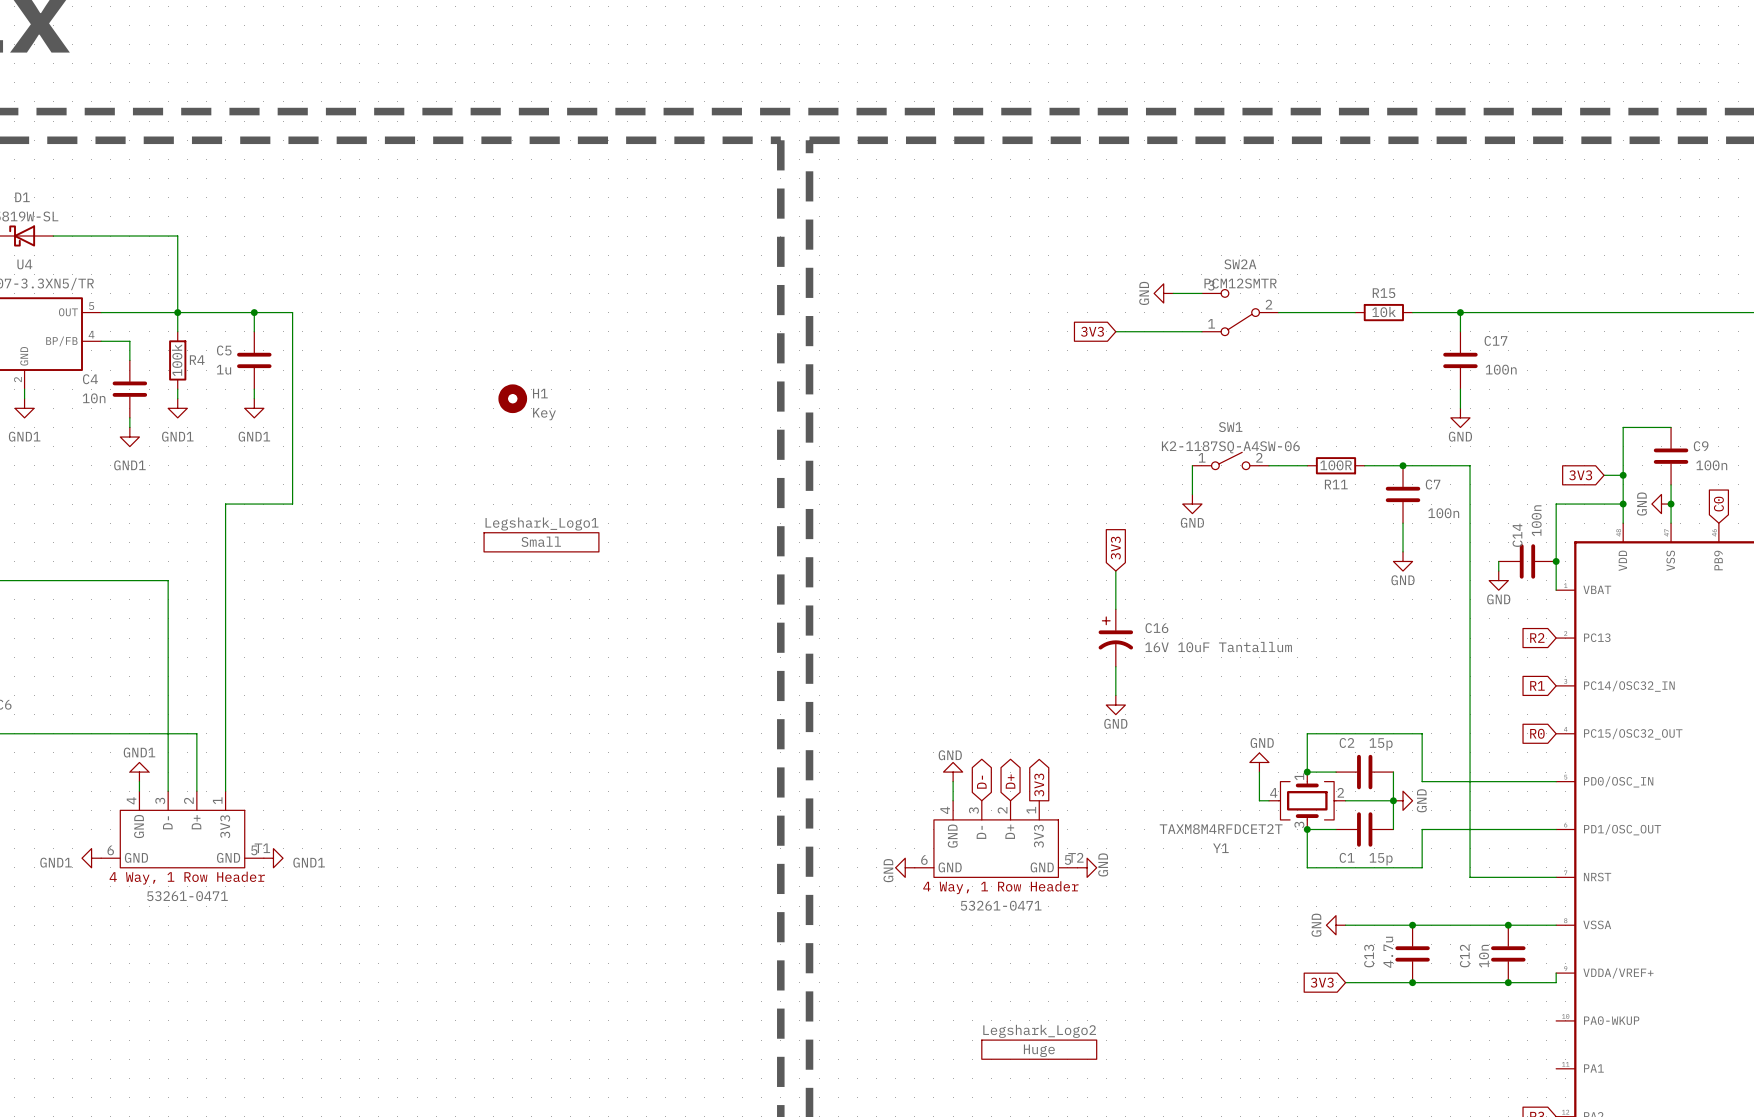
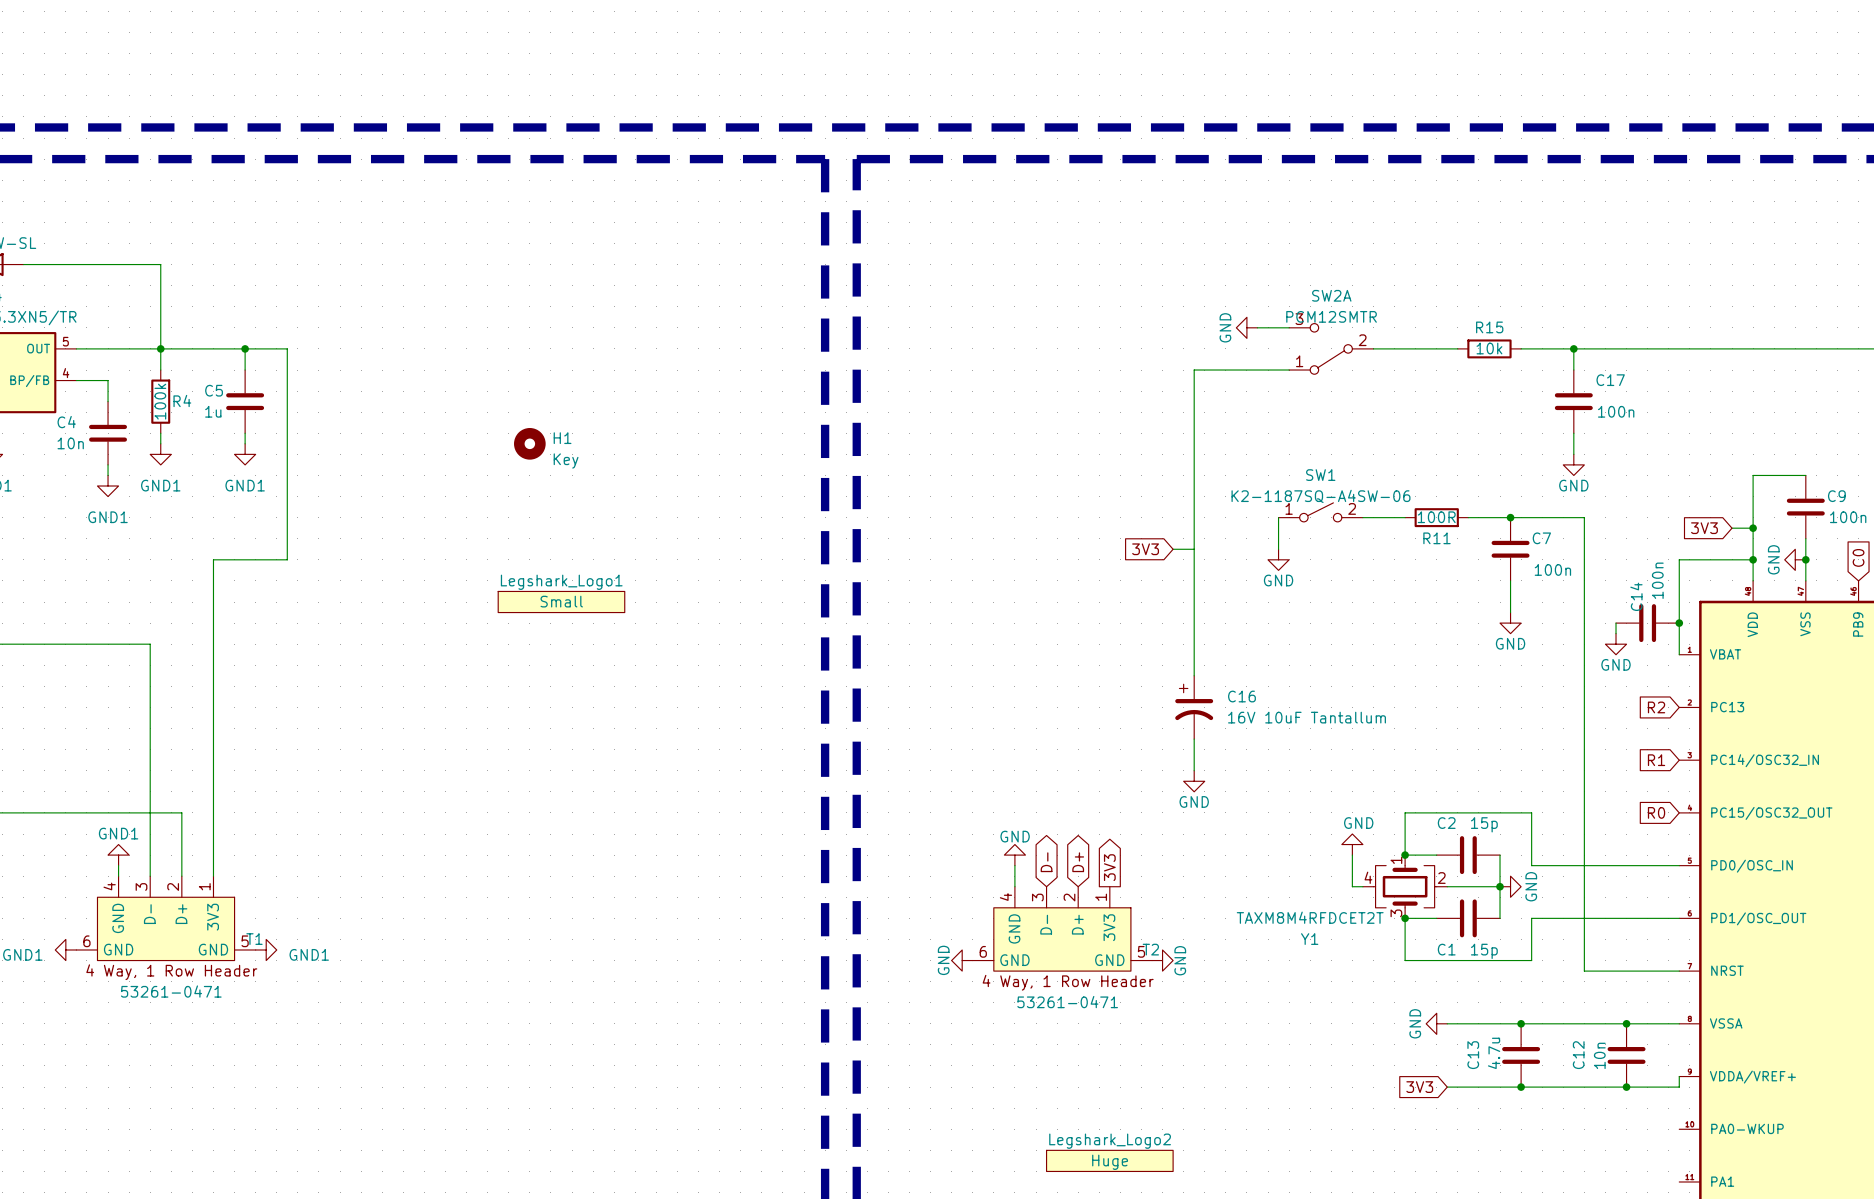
global label: 3V3 (1092, 331) -> none
wire: none -> (1194, 370) (1194, 633)
wire: none -> (1173, 549) (1194, 549)
global label rotation: 0° (1115, 548) -> 90° counterclockwise (1145, 549)
global label position: 3V3 (1115, 548) -> 3V3 (1145, 549)

